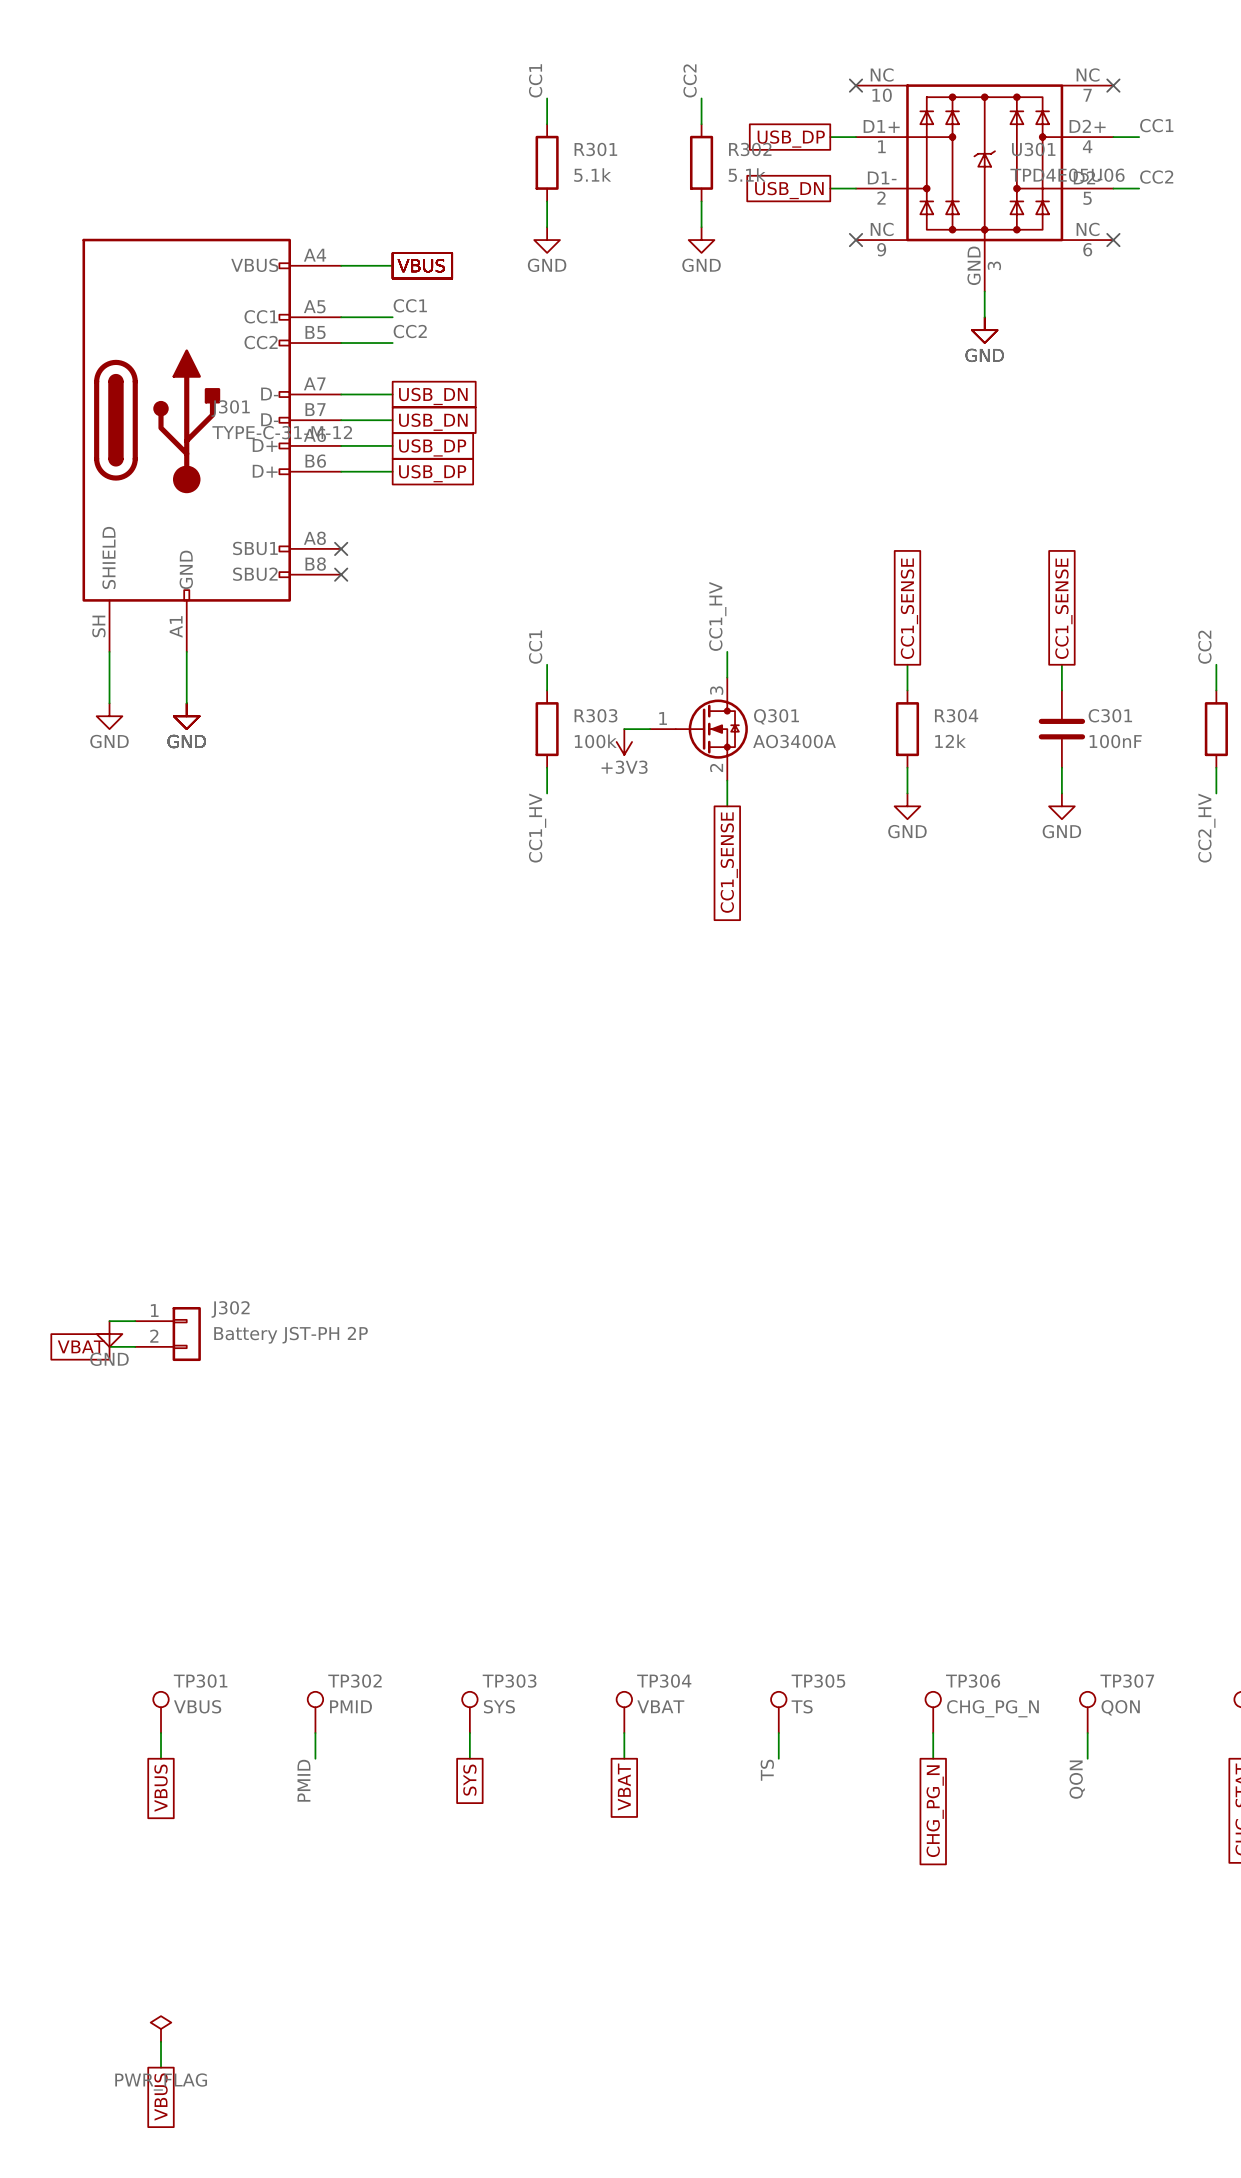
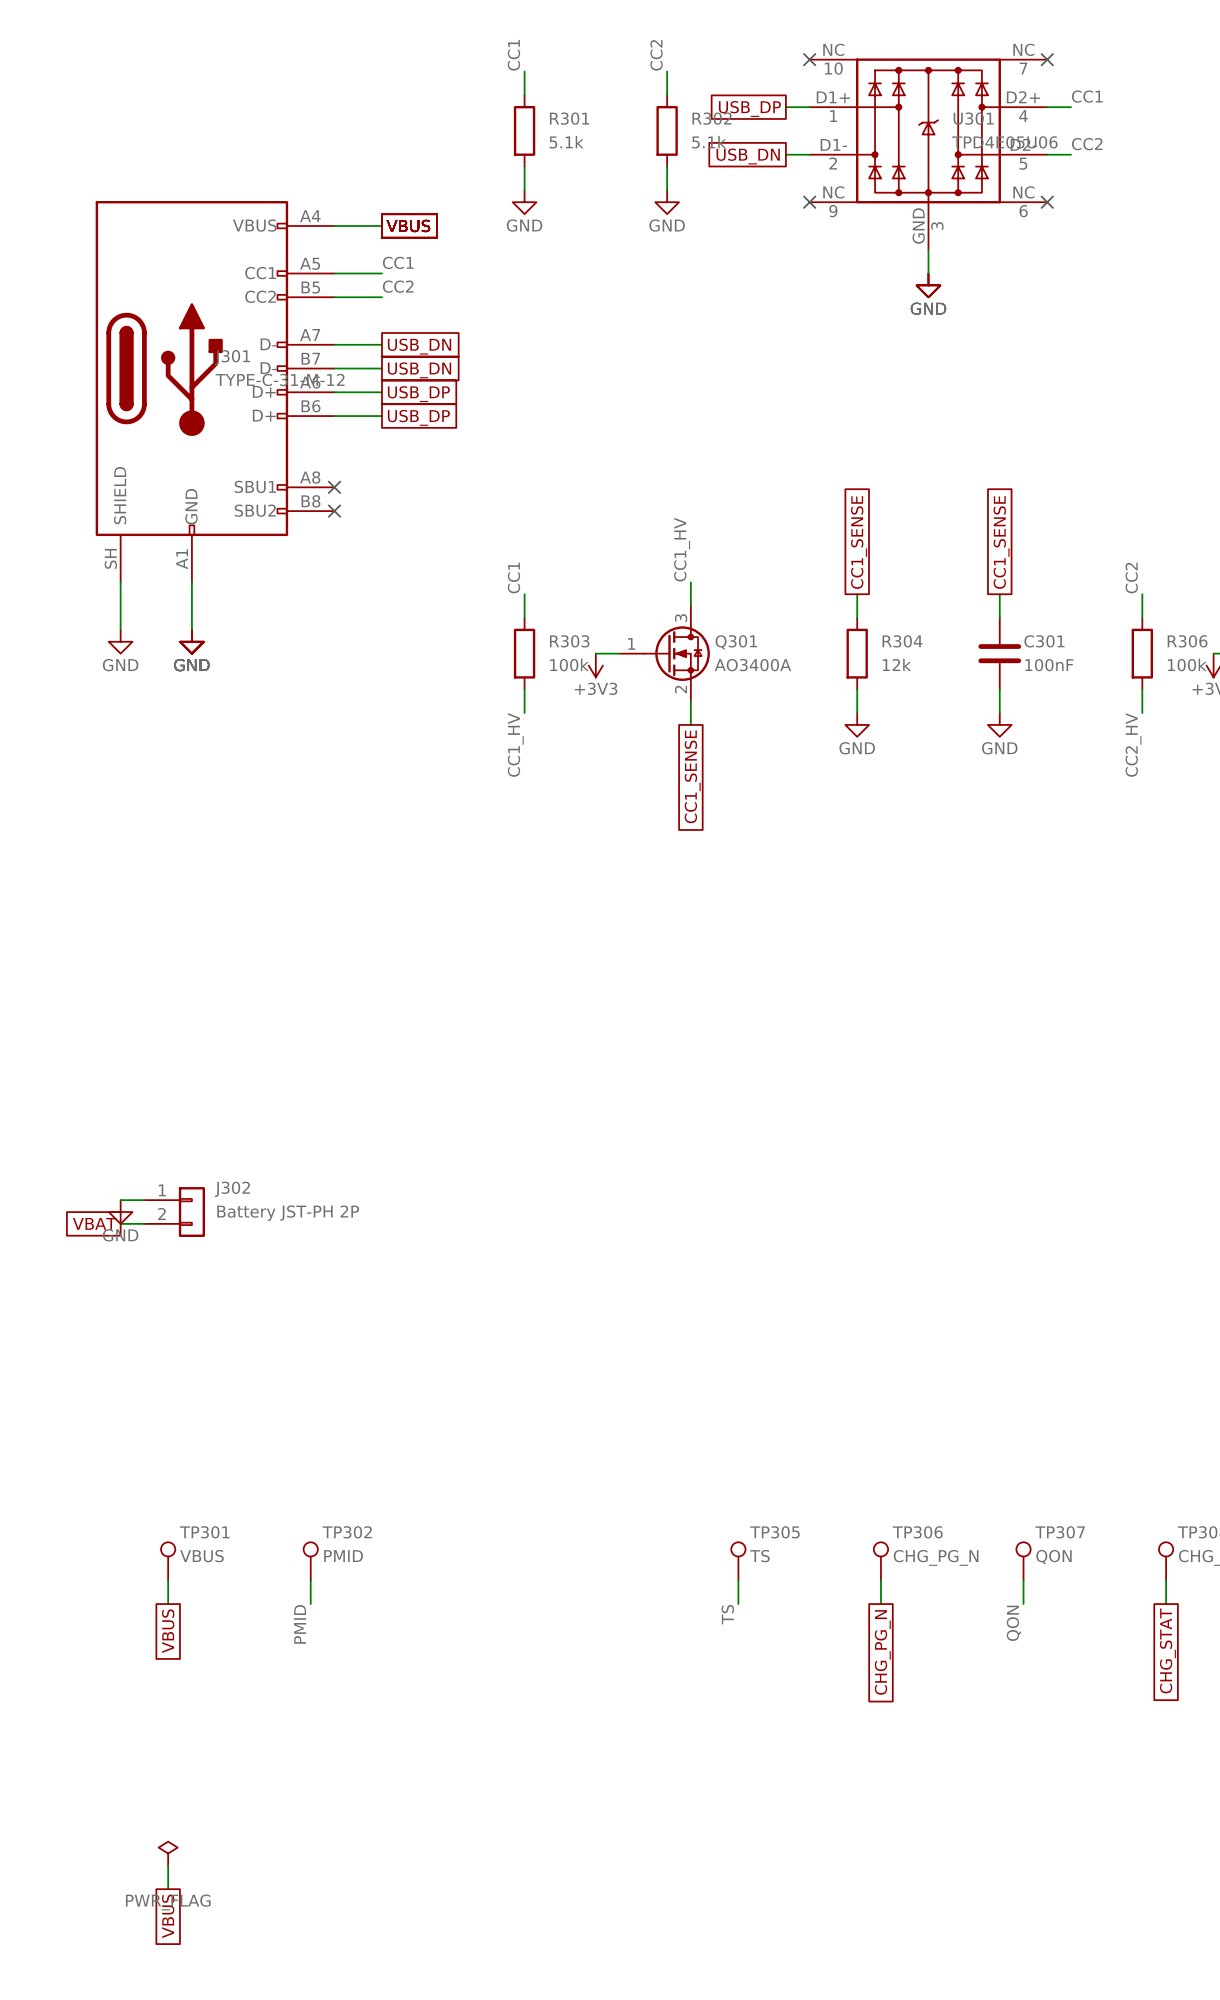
TP303: SYS (469, 1712) -> none
TP304: VBAT (624, 1712) -> none
wire: (469, 1733) (469, 1758) -> none
wire: (624, 1733) (624, 1758) -> none
global label: SYS (469, 1780) -> none
global label: VBAT (624, 1787) -> none

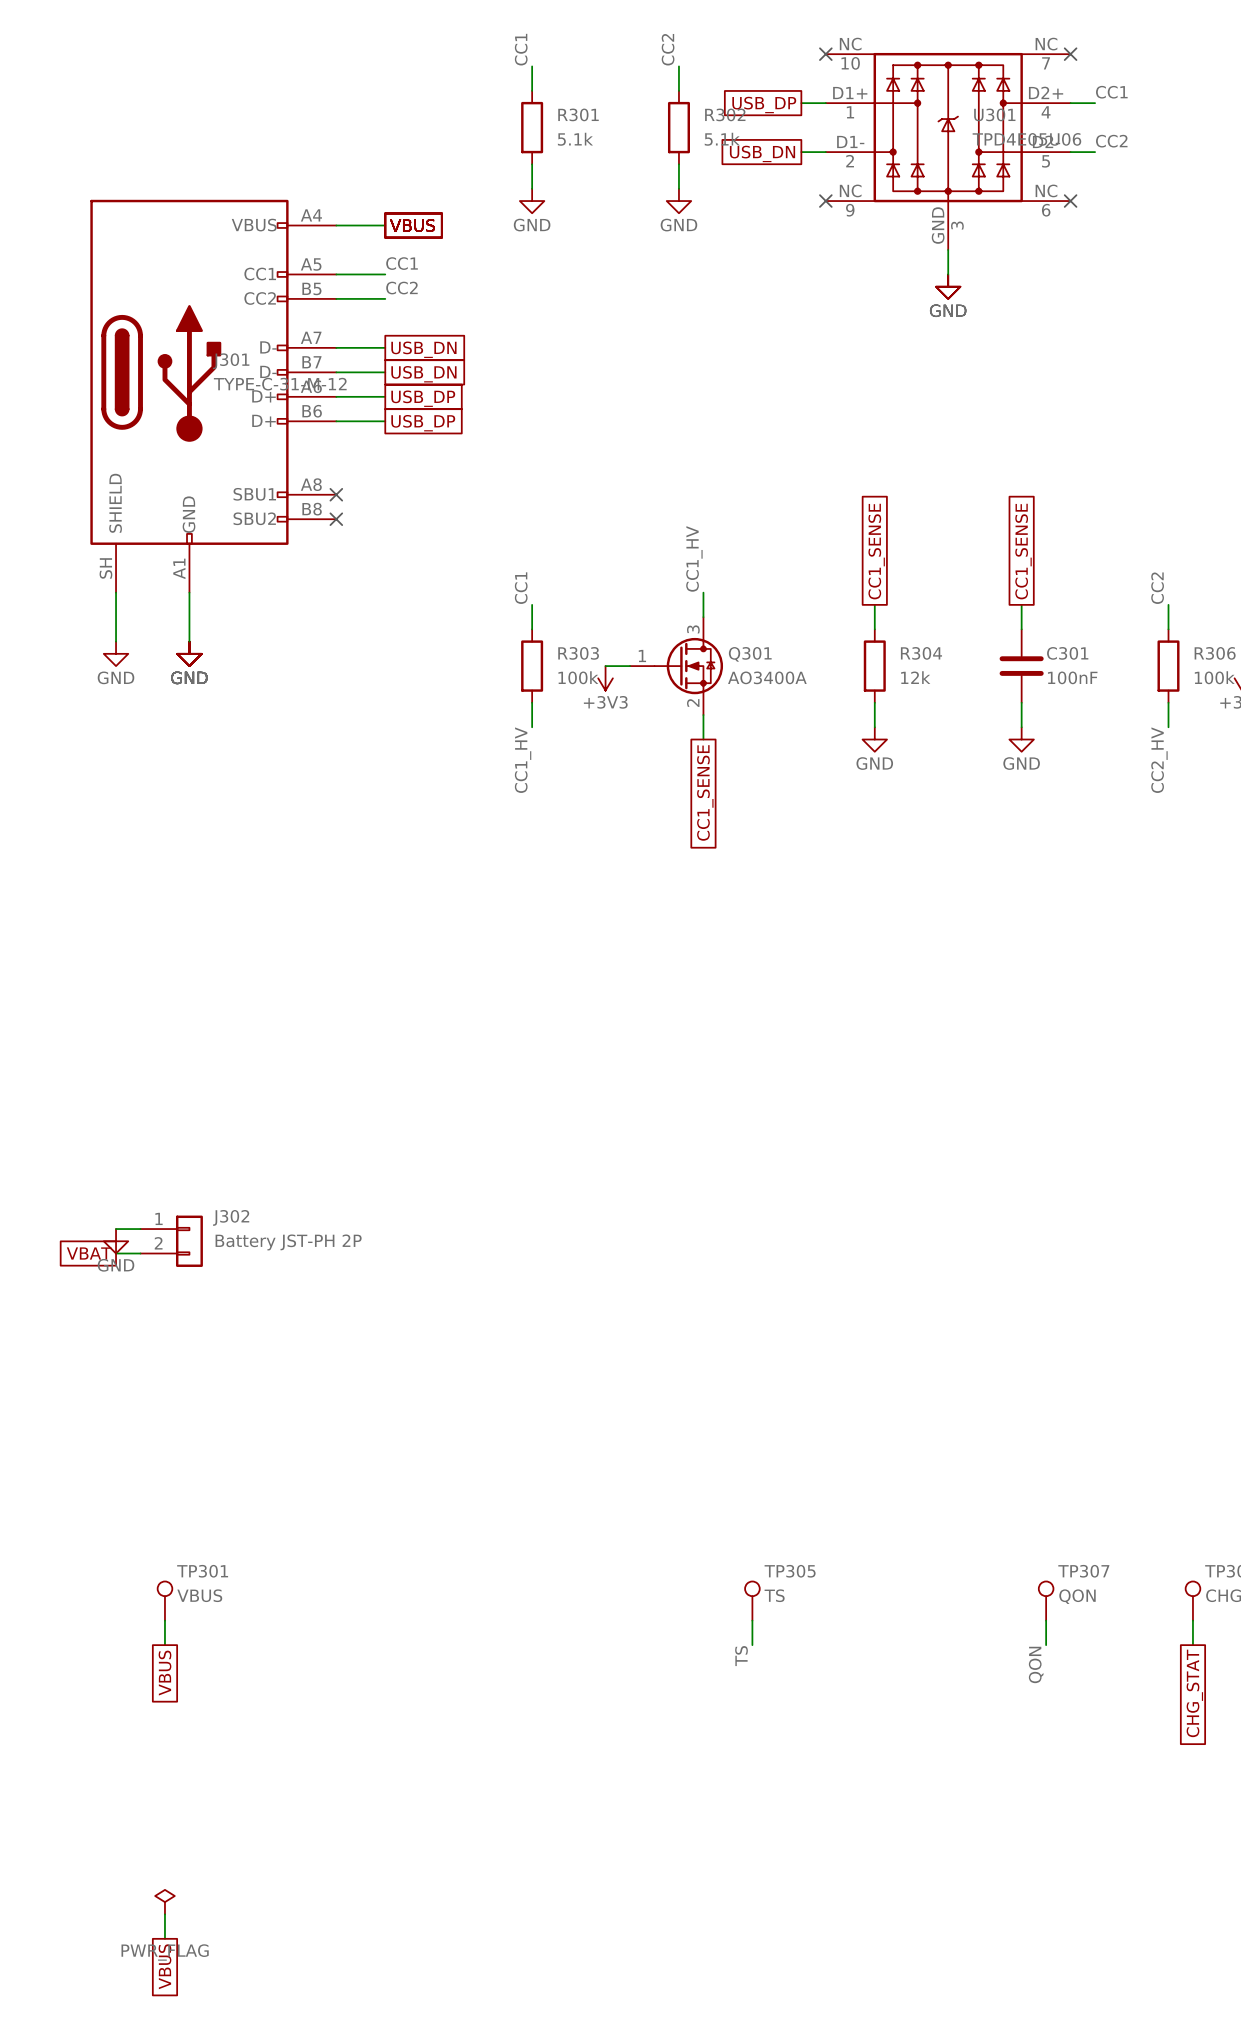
TP302: PMID (310, 1561) -> none
TP306: CHG_PG_N (880, 1561) -> none
wire: (310, 1580) (310, 1604) -> none
wire: (880, 1580) (880, 1604) -> none
label: PMID (300, 1624) -> none
global label: CHG_PG_N (882, 1652) -> none

